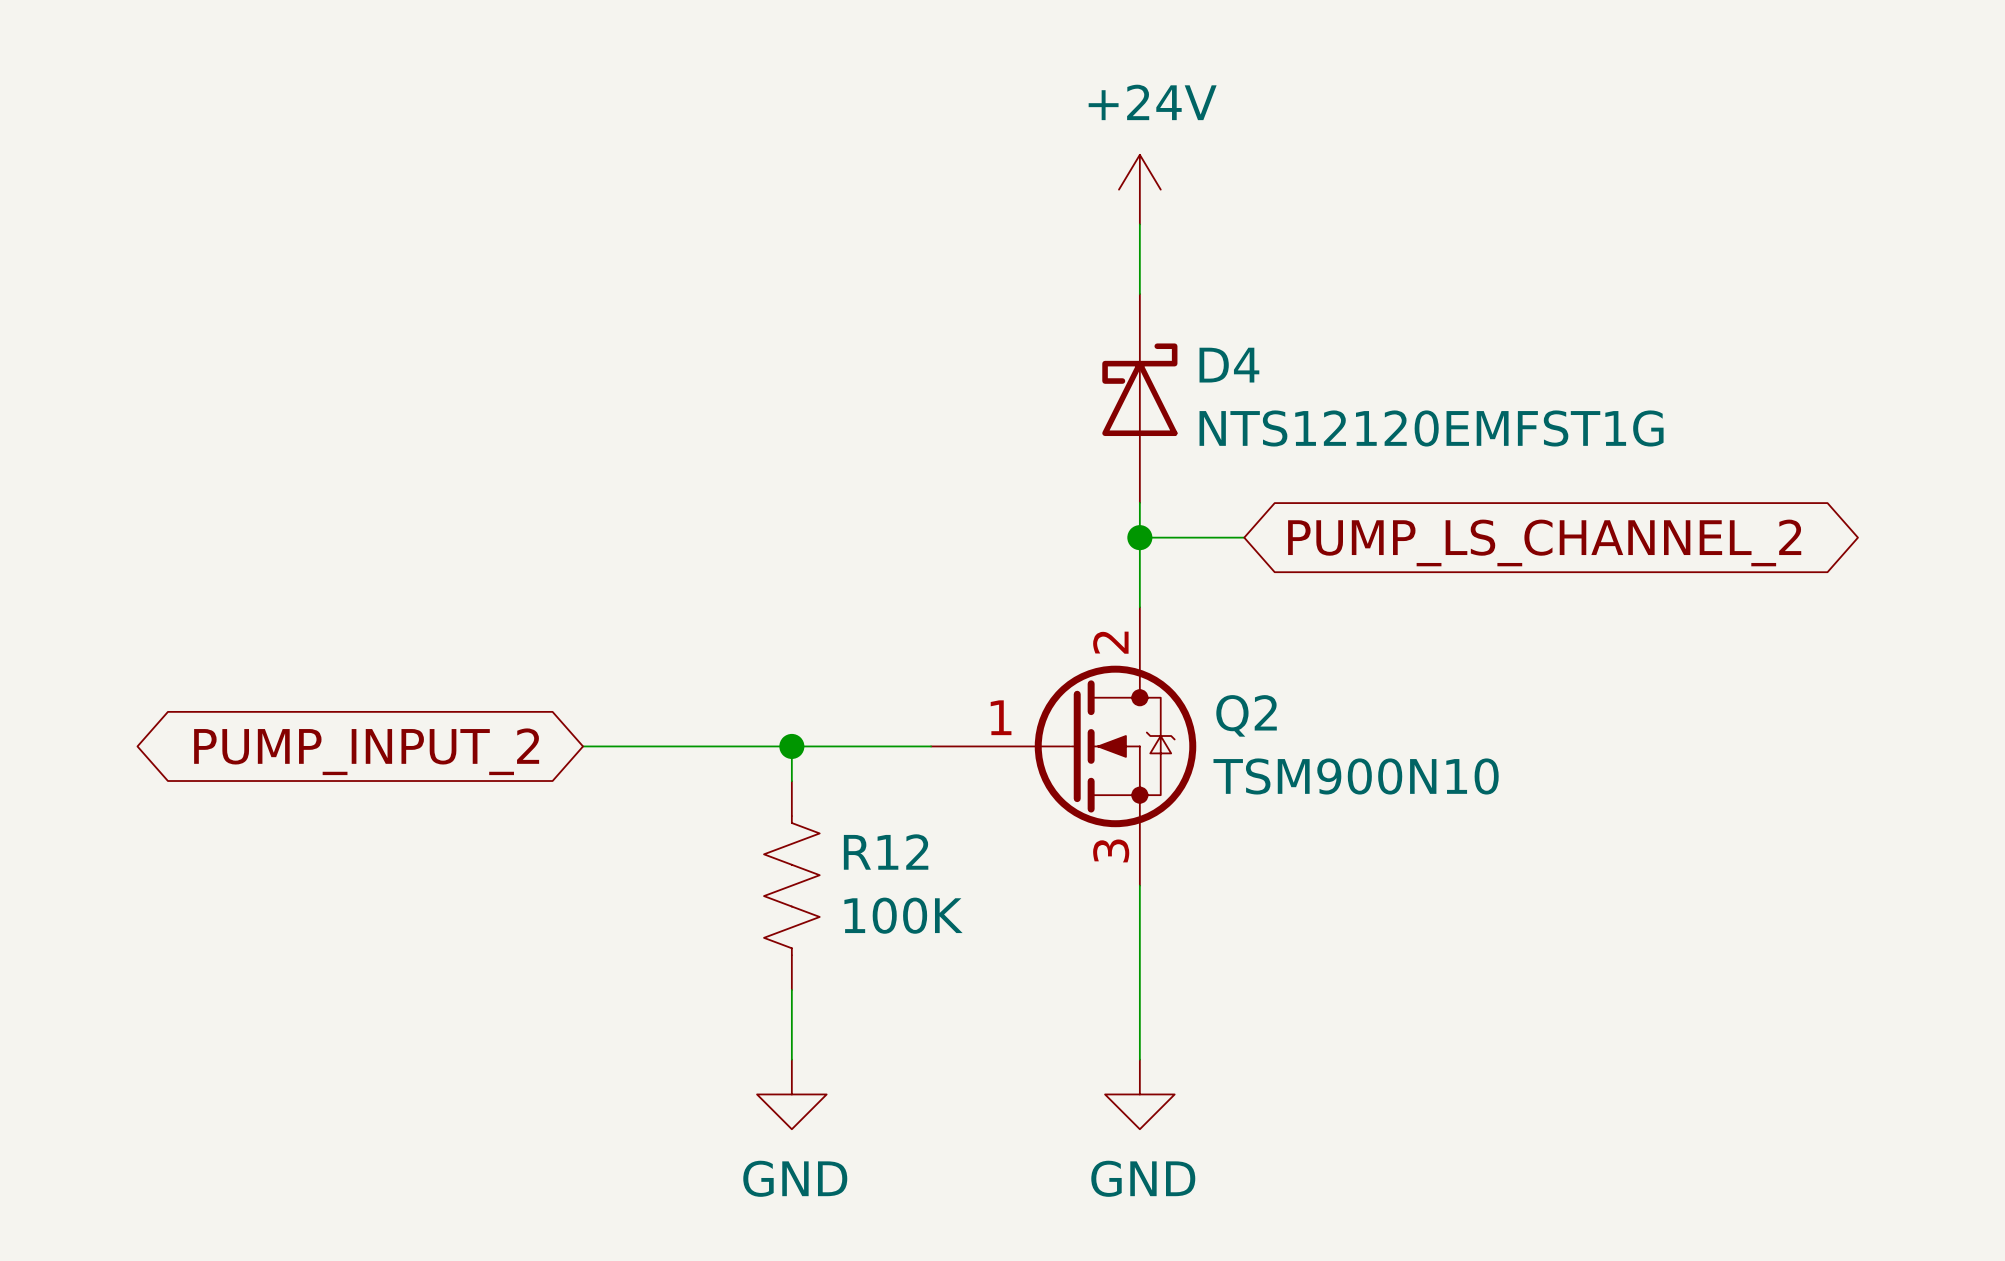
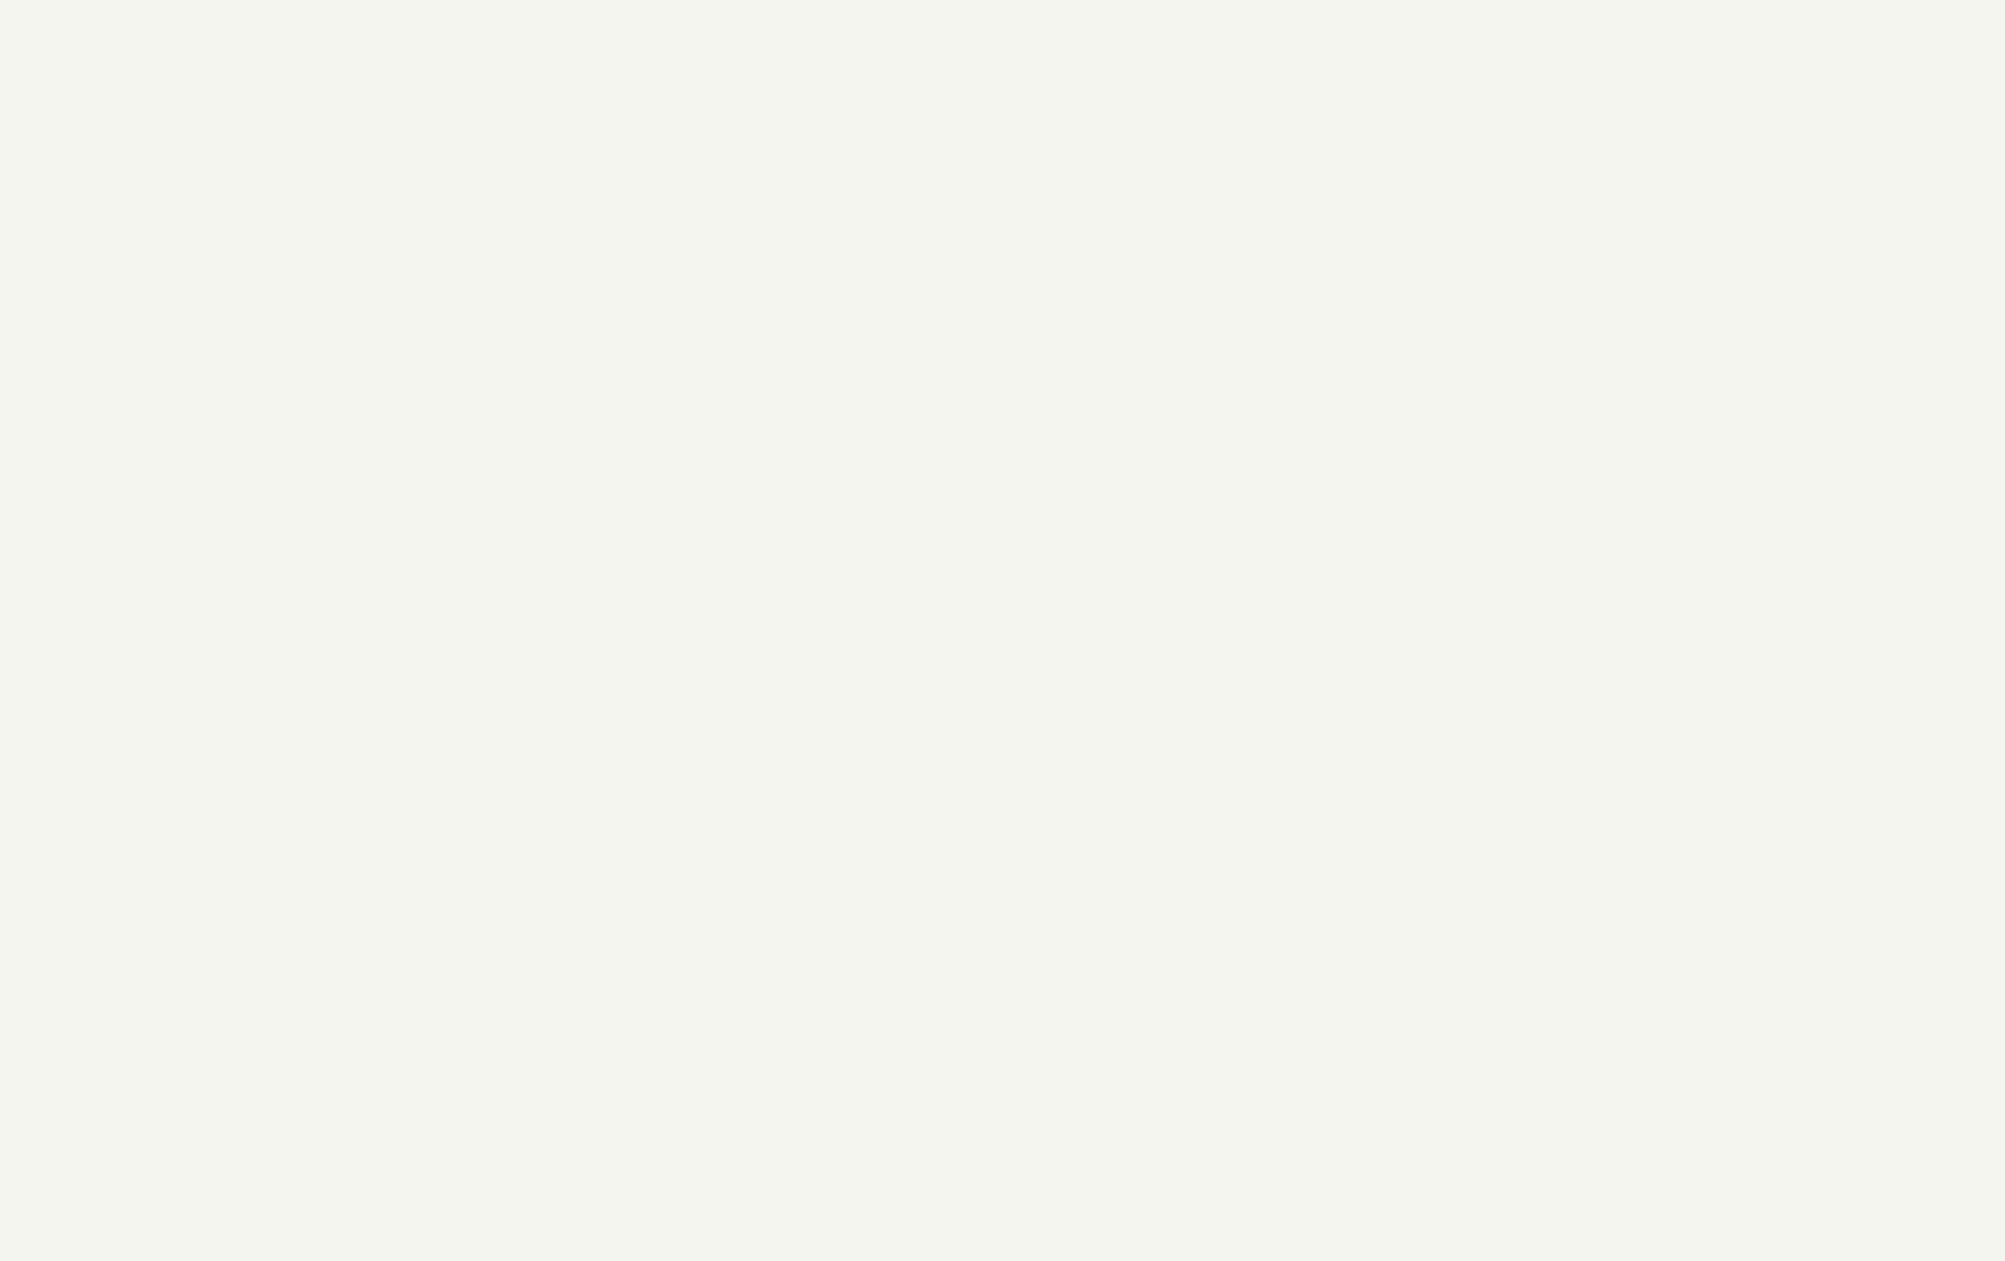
power symbol: +24V (1139, 189) -> none
wire: (1139, 224) (1139, 294) -> none
D4: NTS12120EMFST1G (1139, 398) -> none
wire: (1139, 502) (1139, 607) -> none
wire: (1139, 537) (1244, 537) -> none
junction: (1139, 537) -> none
global label: PUMP_LS_CHANNEL_2 (1544, 542) -> none
wire: (583, 746) (931, 746) -> none
wire: (791, 746) (791, 781) -> none
junction: (791, 746) -> none
Q2: TSM900N10 (1063, 746) -> none
global label: PUMP_INPUT_2 (366, 751) -> none
R12: 100K (791, 885) -> none
wire: (1139, 885) (1139, 1059) -> none
wire: (791, 990) (791, 1059) -> none
power symbol: GND (791, 1094) -> none
power symbol: GND (1139, 1094) -> none

